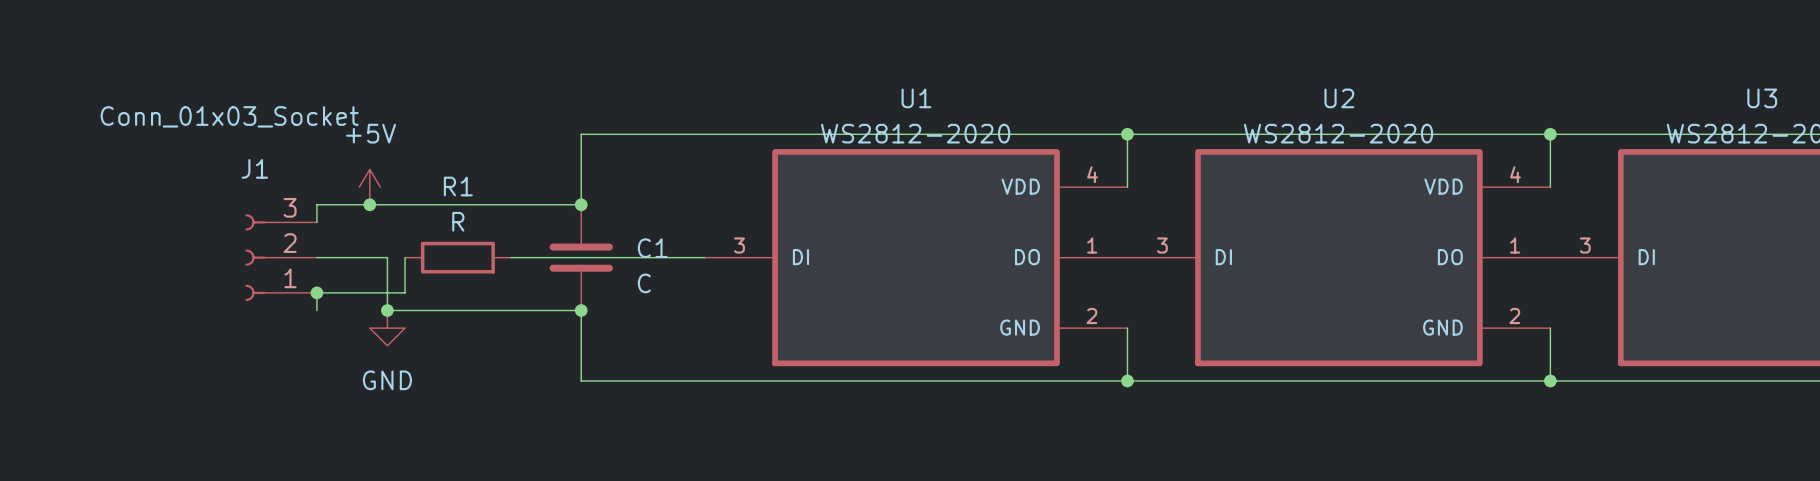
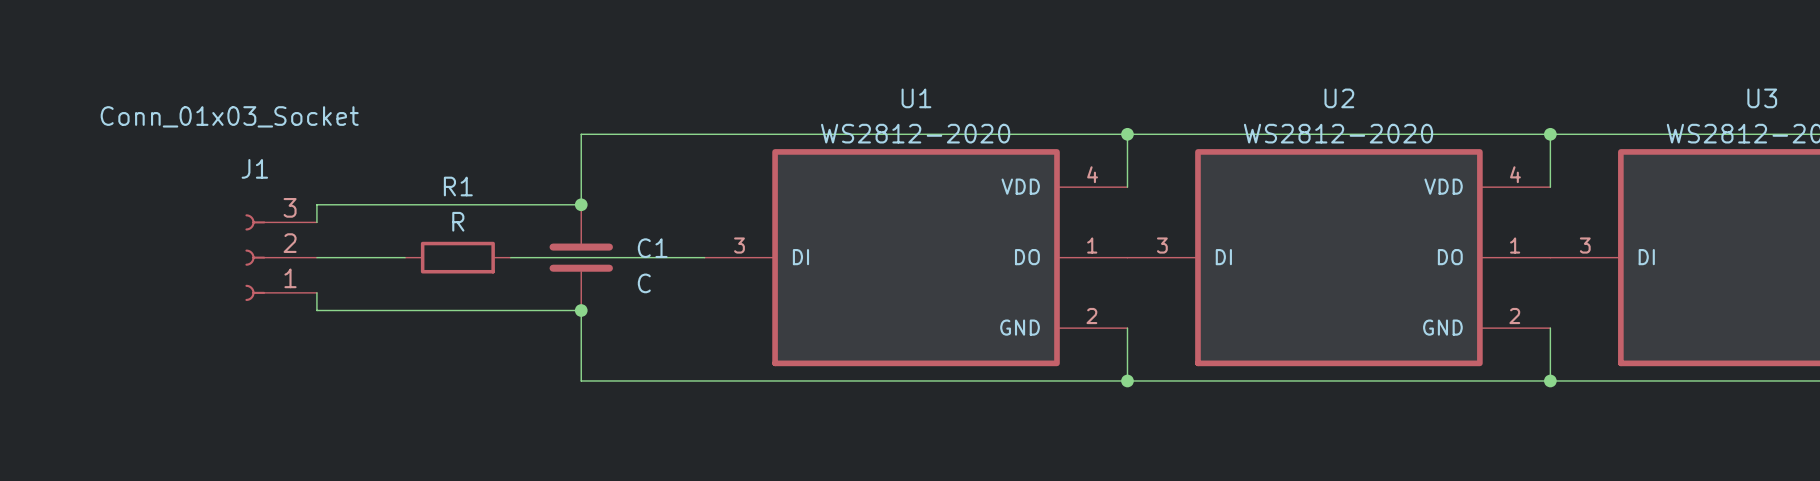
power symbol: +5V (369, 187) -> none
junction: (369, 204) -> none
wire: (387, 257) (387, 310) -> (387, 257) (405, 257)
wire: (405, 257) (405, 292) (316, 292) -> none
junction: (316, 292) -> none
wire: none -> (316, 310) (387, 310)
junction: (387, 310) -> none
power symbol: GND (387, 328) -> none

